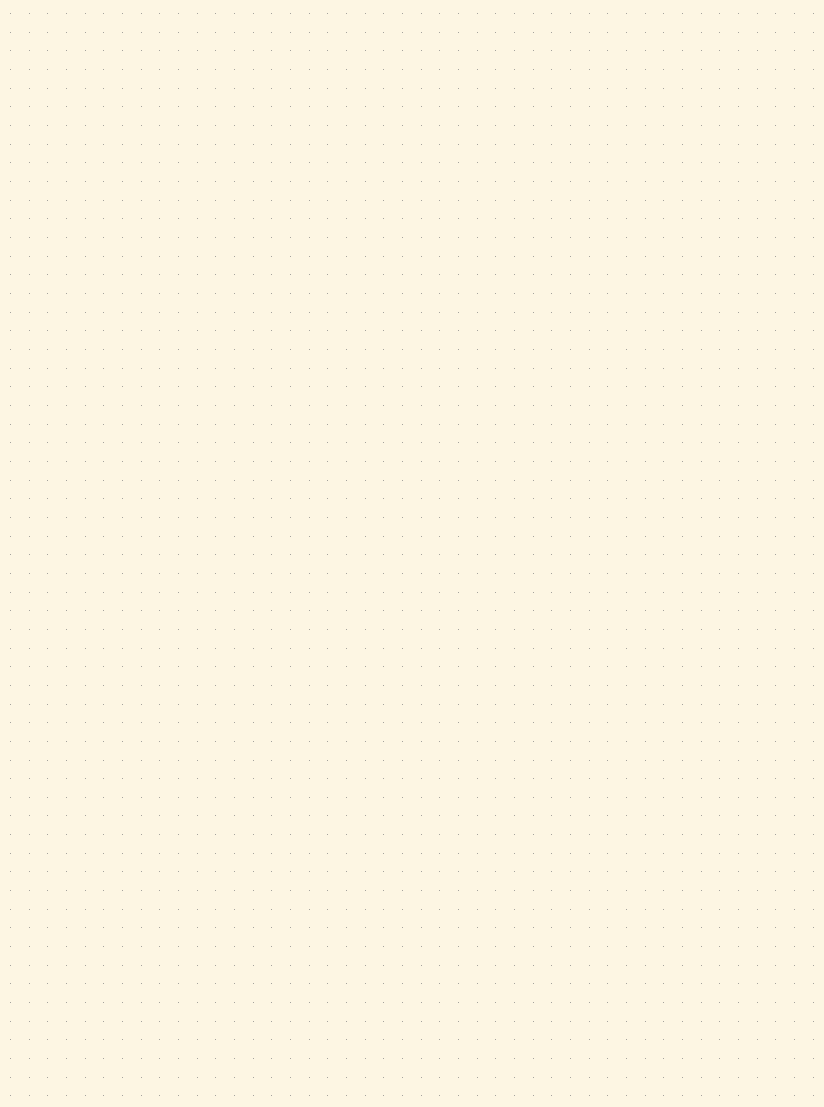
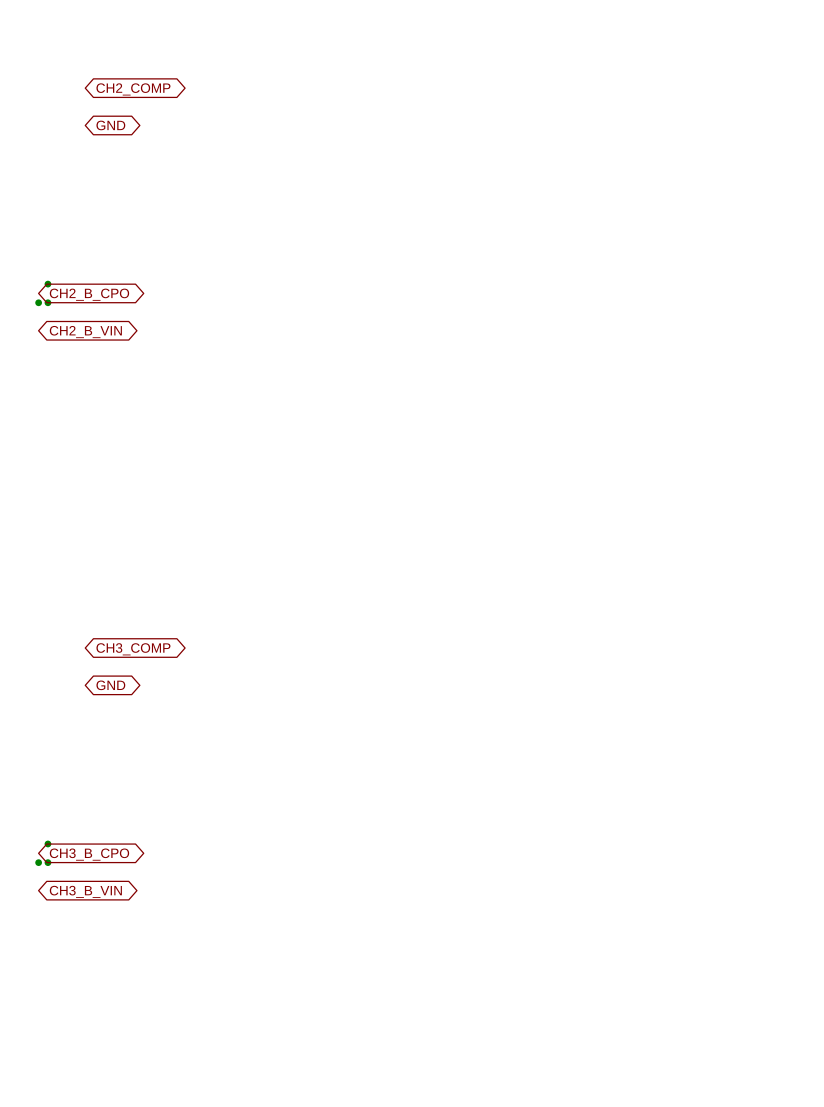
global label: none -> CH2_COMP (133, 89)
global label: none -> GND (110, 125)
junction: none -> (47, 284)
global label: none -> CH2_B_CPO (89, 294)
junction: none -> (38, 302)
junction: none -> (47, 302)
global label: none -> CH2_B_VIN (85, 332)
global label: none -> CH3_COMP (133, 649)
global label: none -> GND (110, 685)
junction: none -> (47, 843)
global label: none -> CH3_B_CPO (89, 854)
junction: none -> (38, 862)
junction: none -> (47, 862)
global label: none -> CH3_B_VIN (85, 891)

